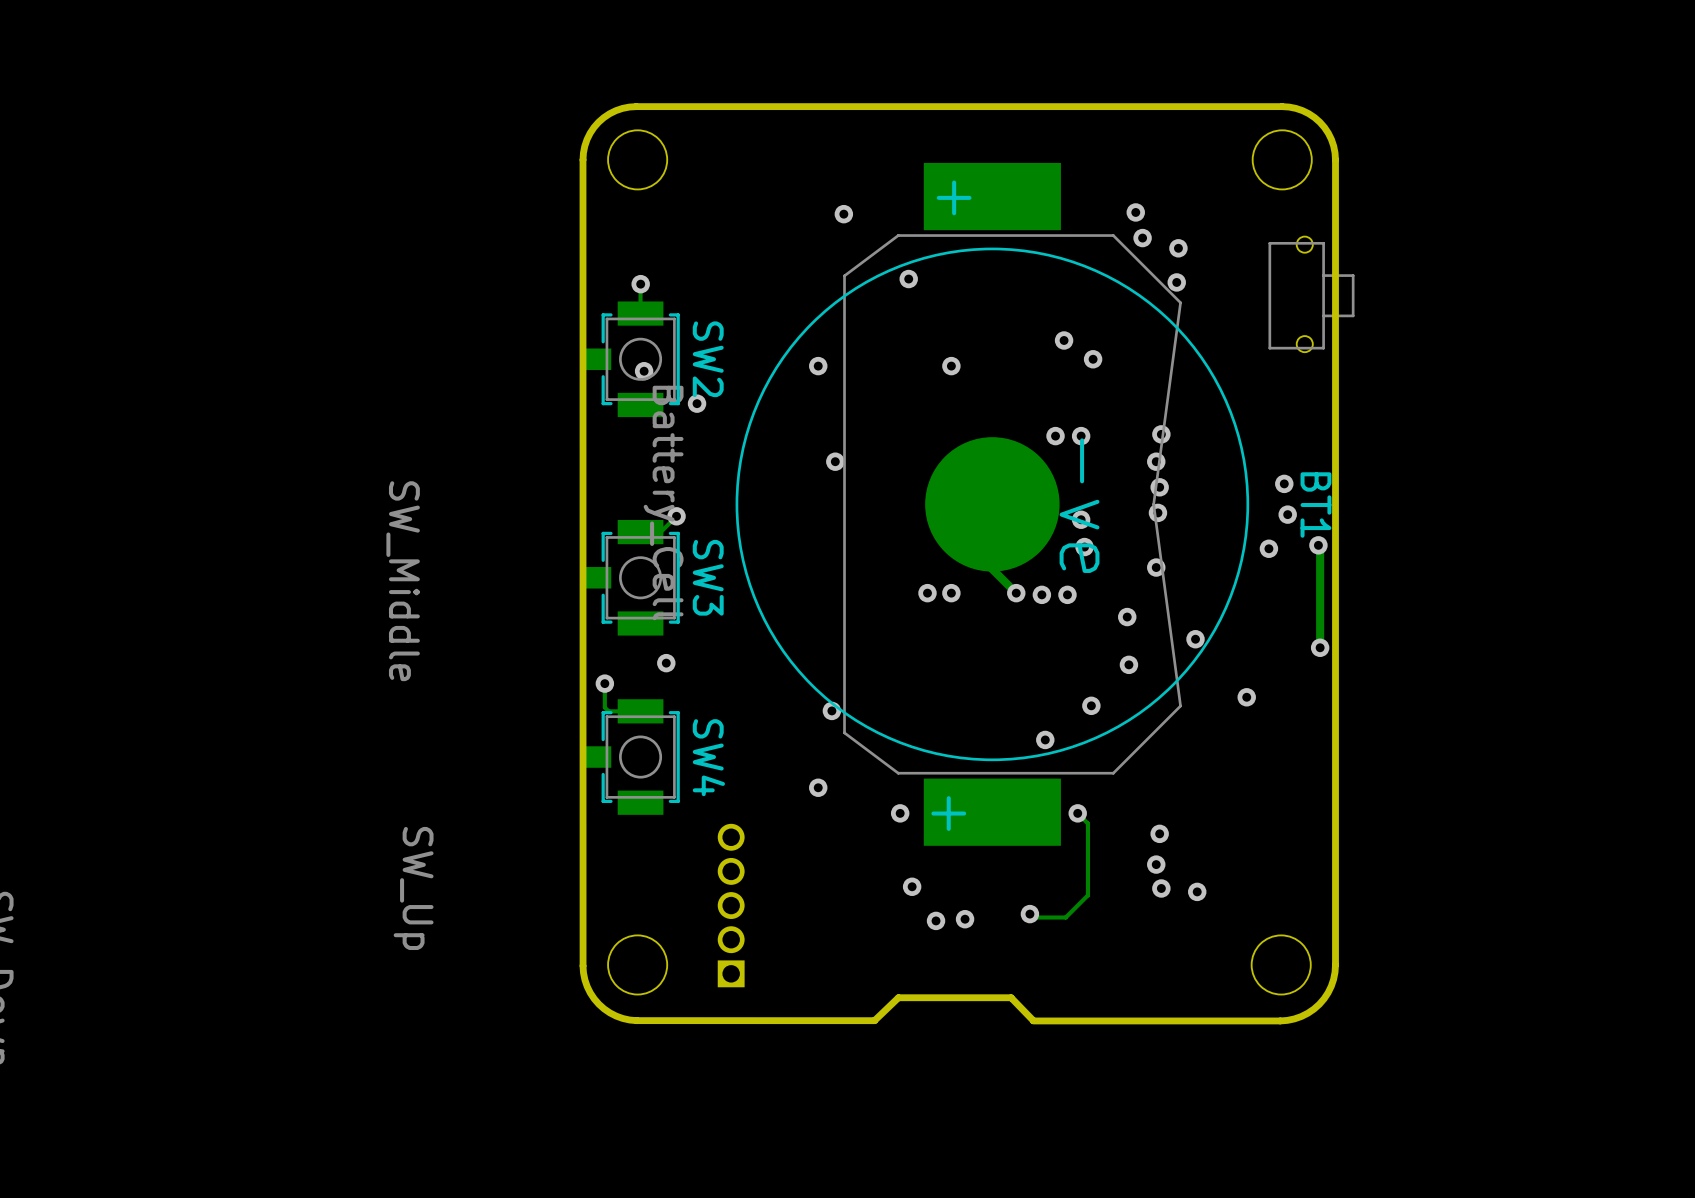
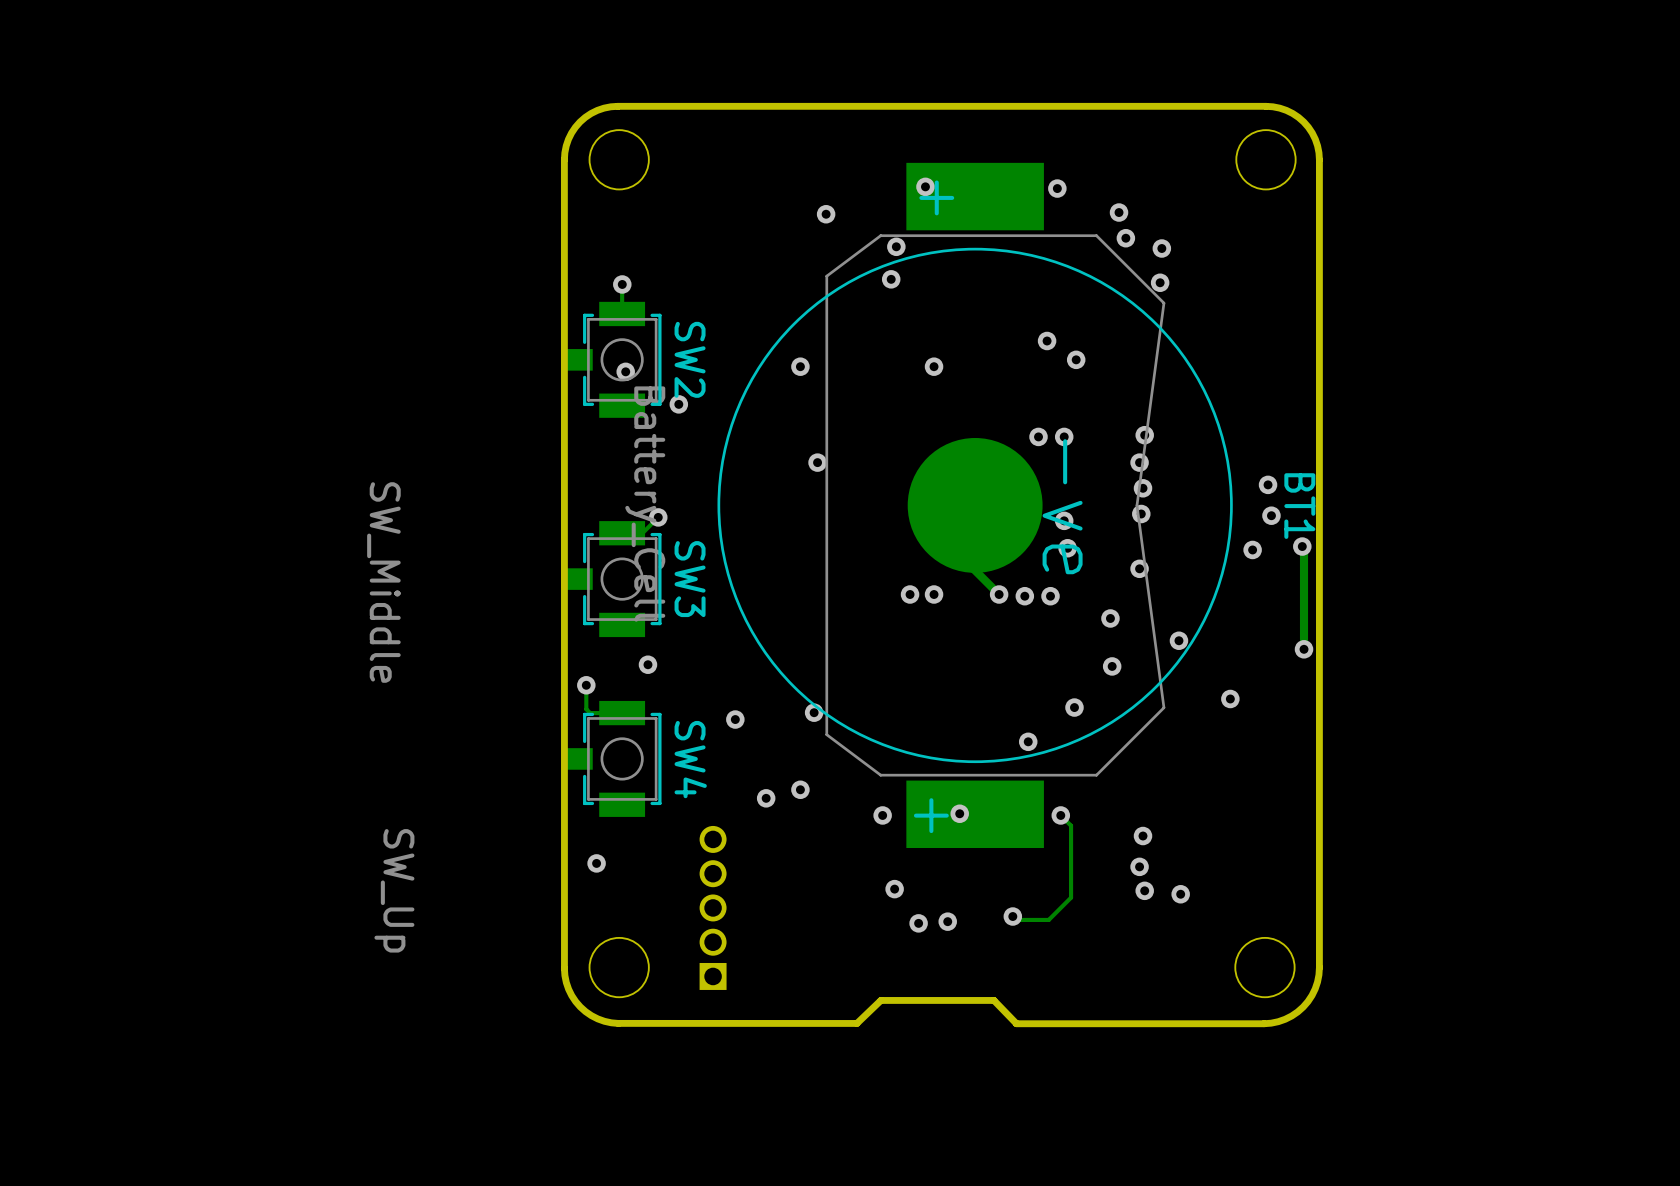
via: none -> (925, 186)
via: none -> (1057, 188)
via: none -> (896, 246)
part: (1311, 294) -> none
via: none -> (735, 719)
via: none -> (766, 798)
via: none -> (959, 813)
via: none -> (596, 863)

